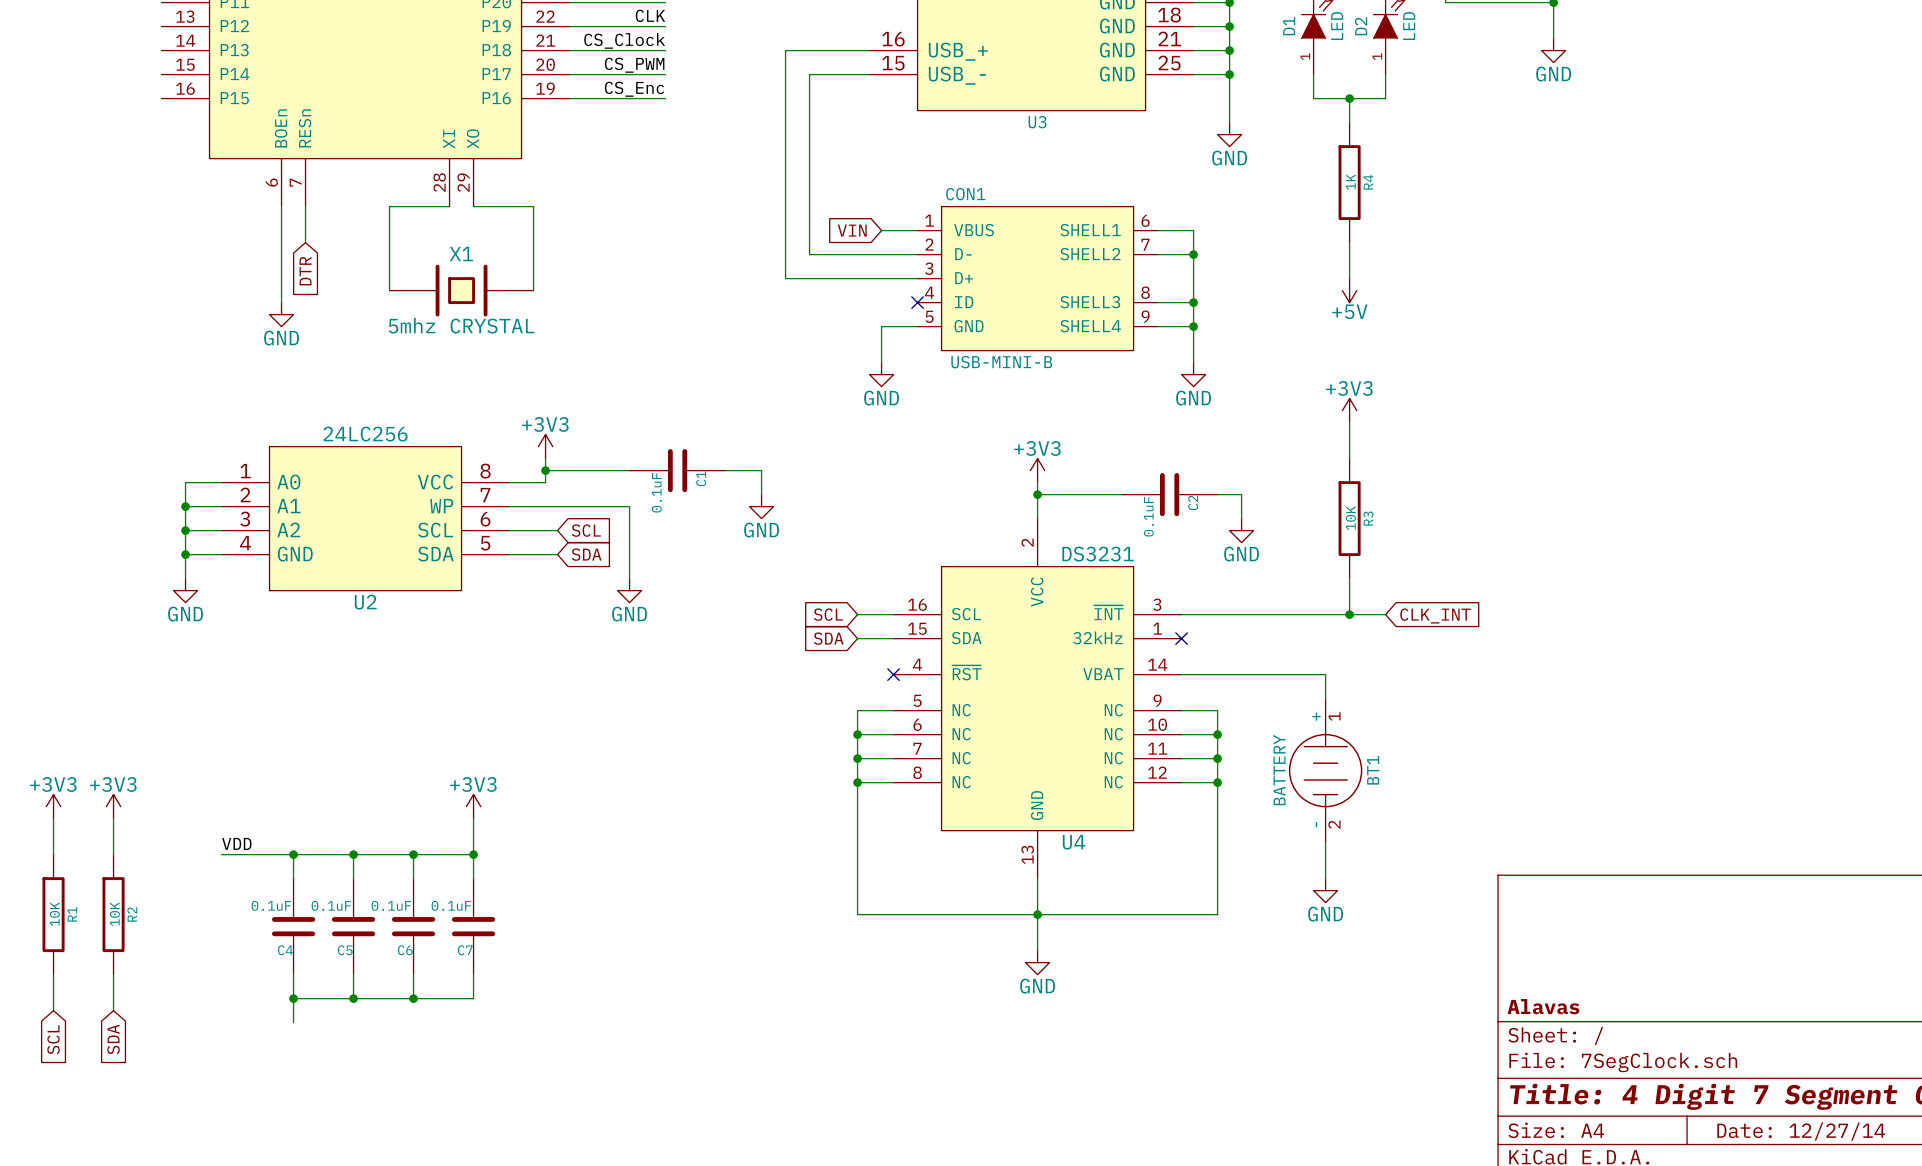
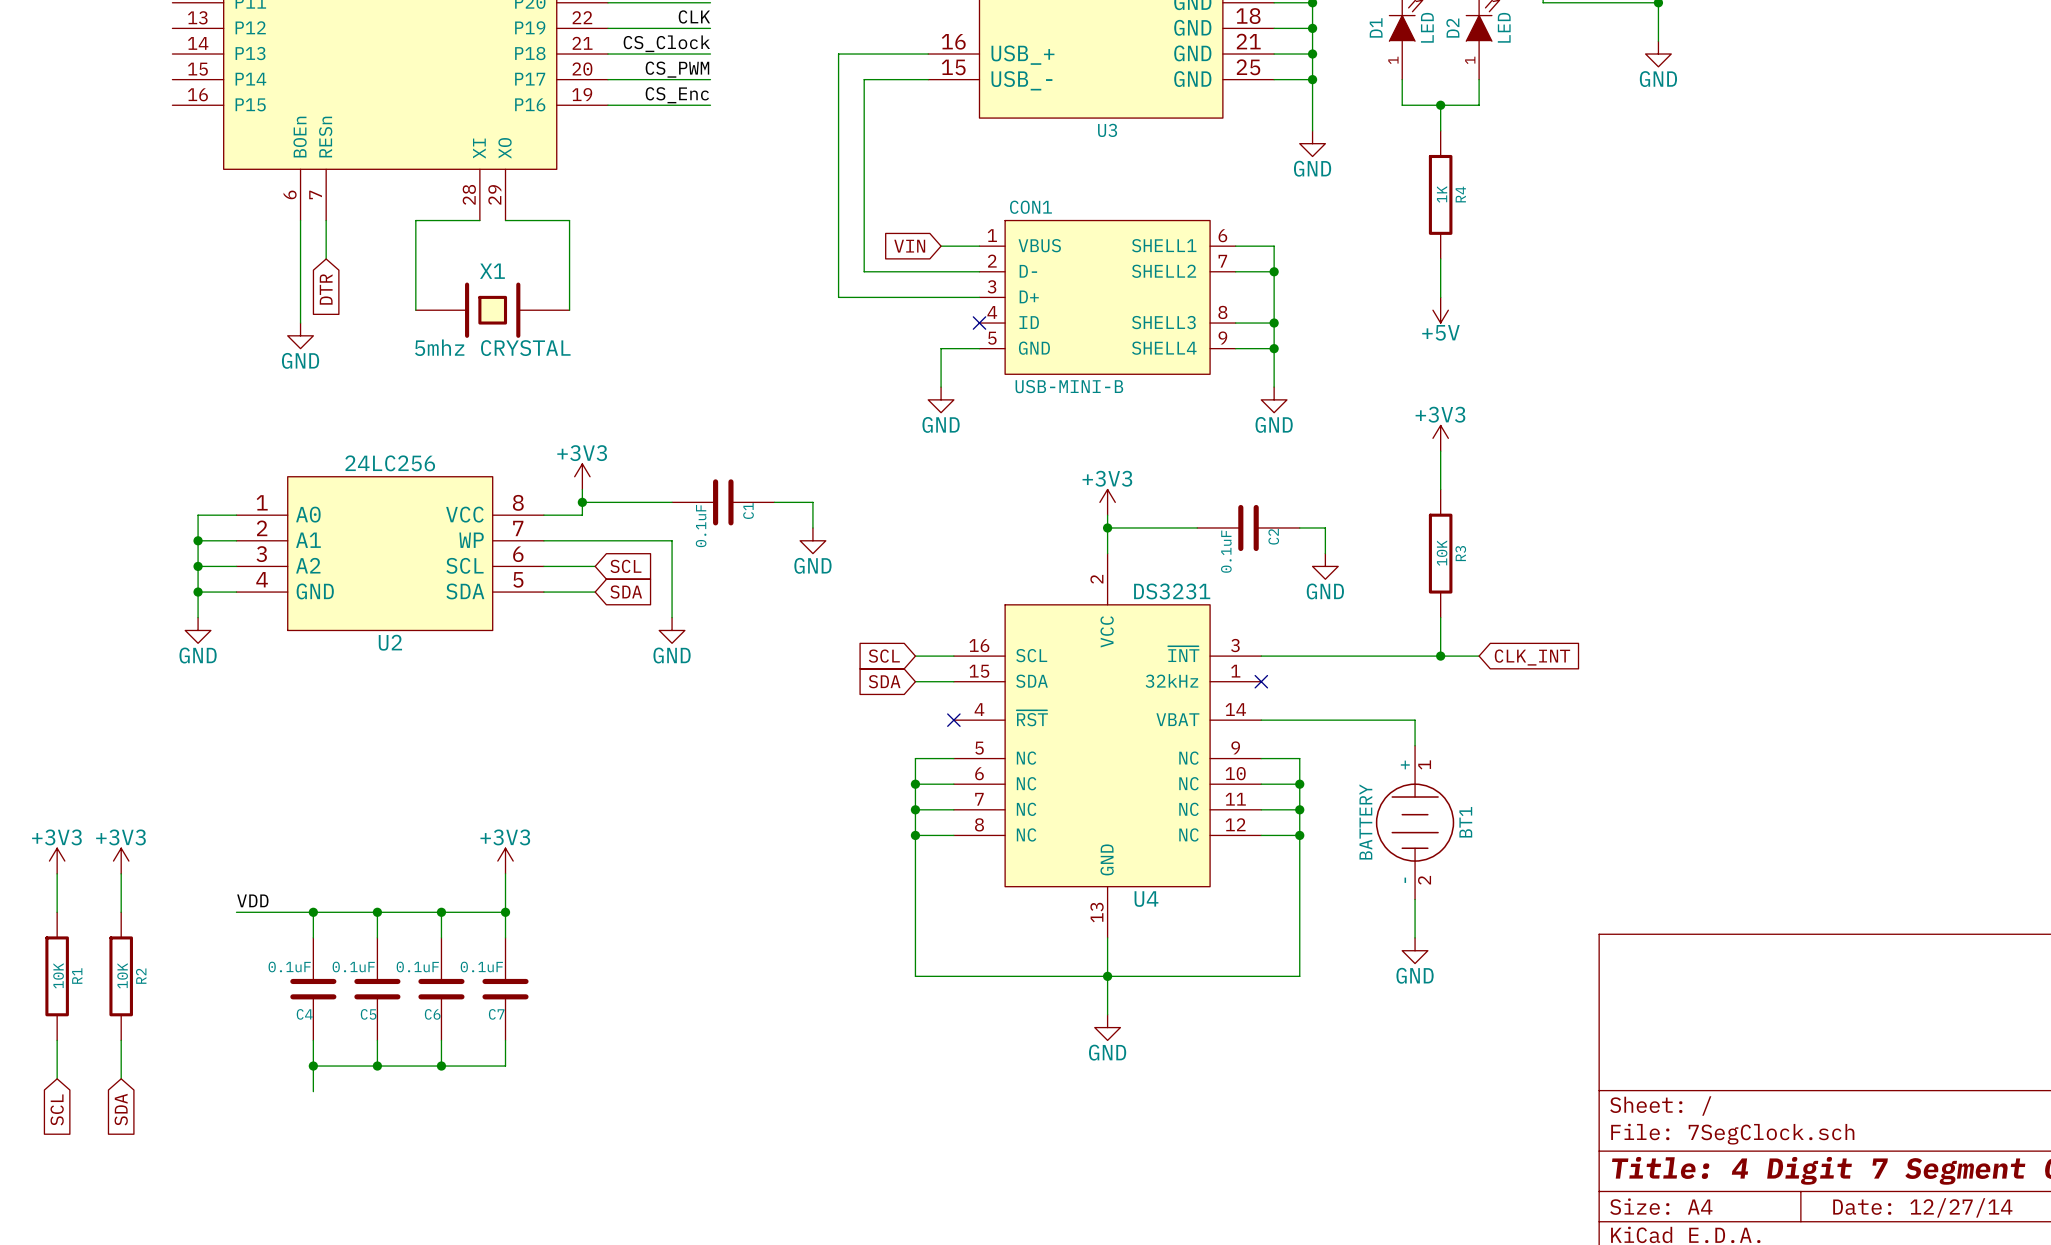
title block: Alavas (1543, 1006) -> none

